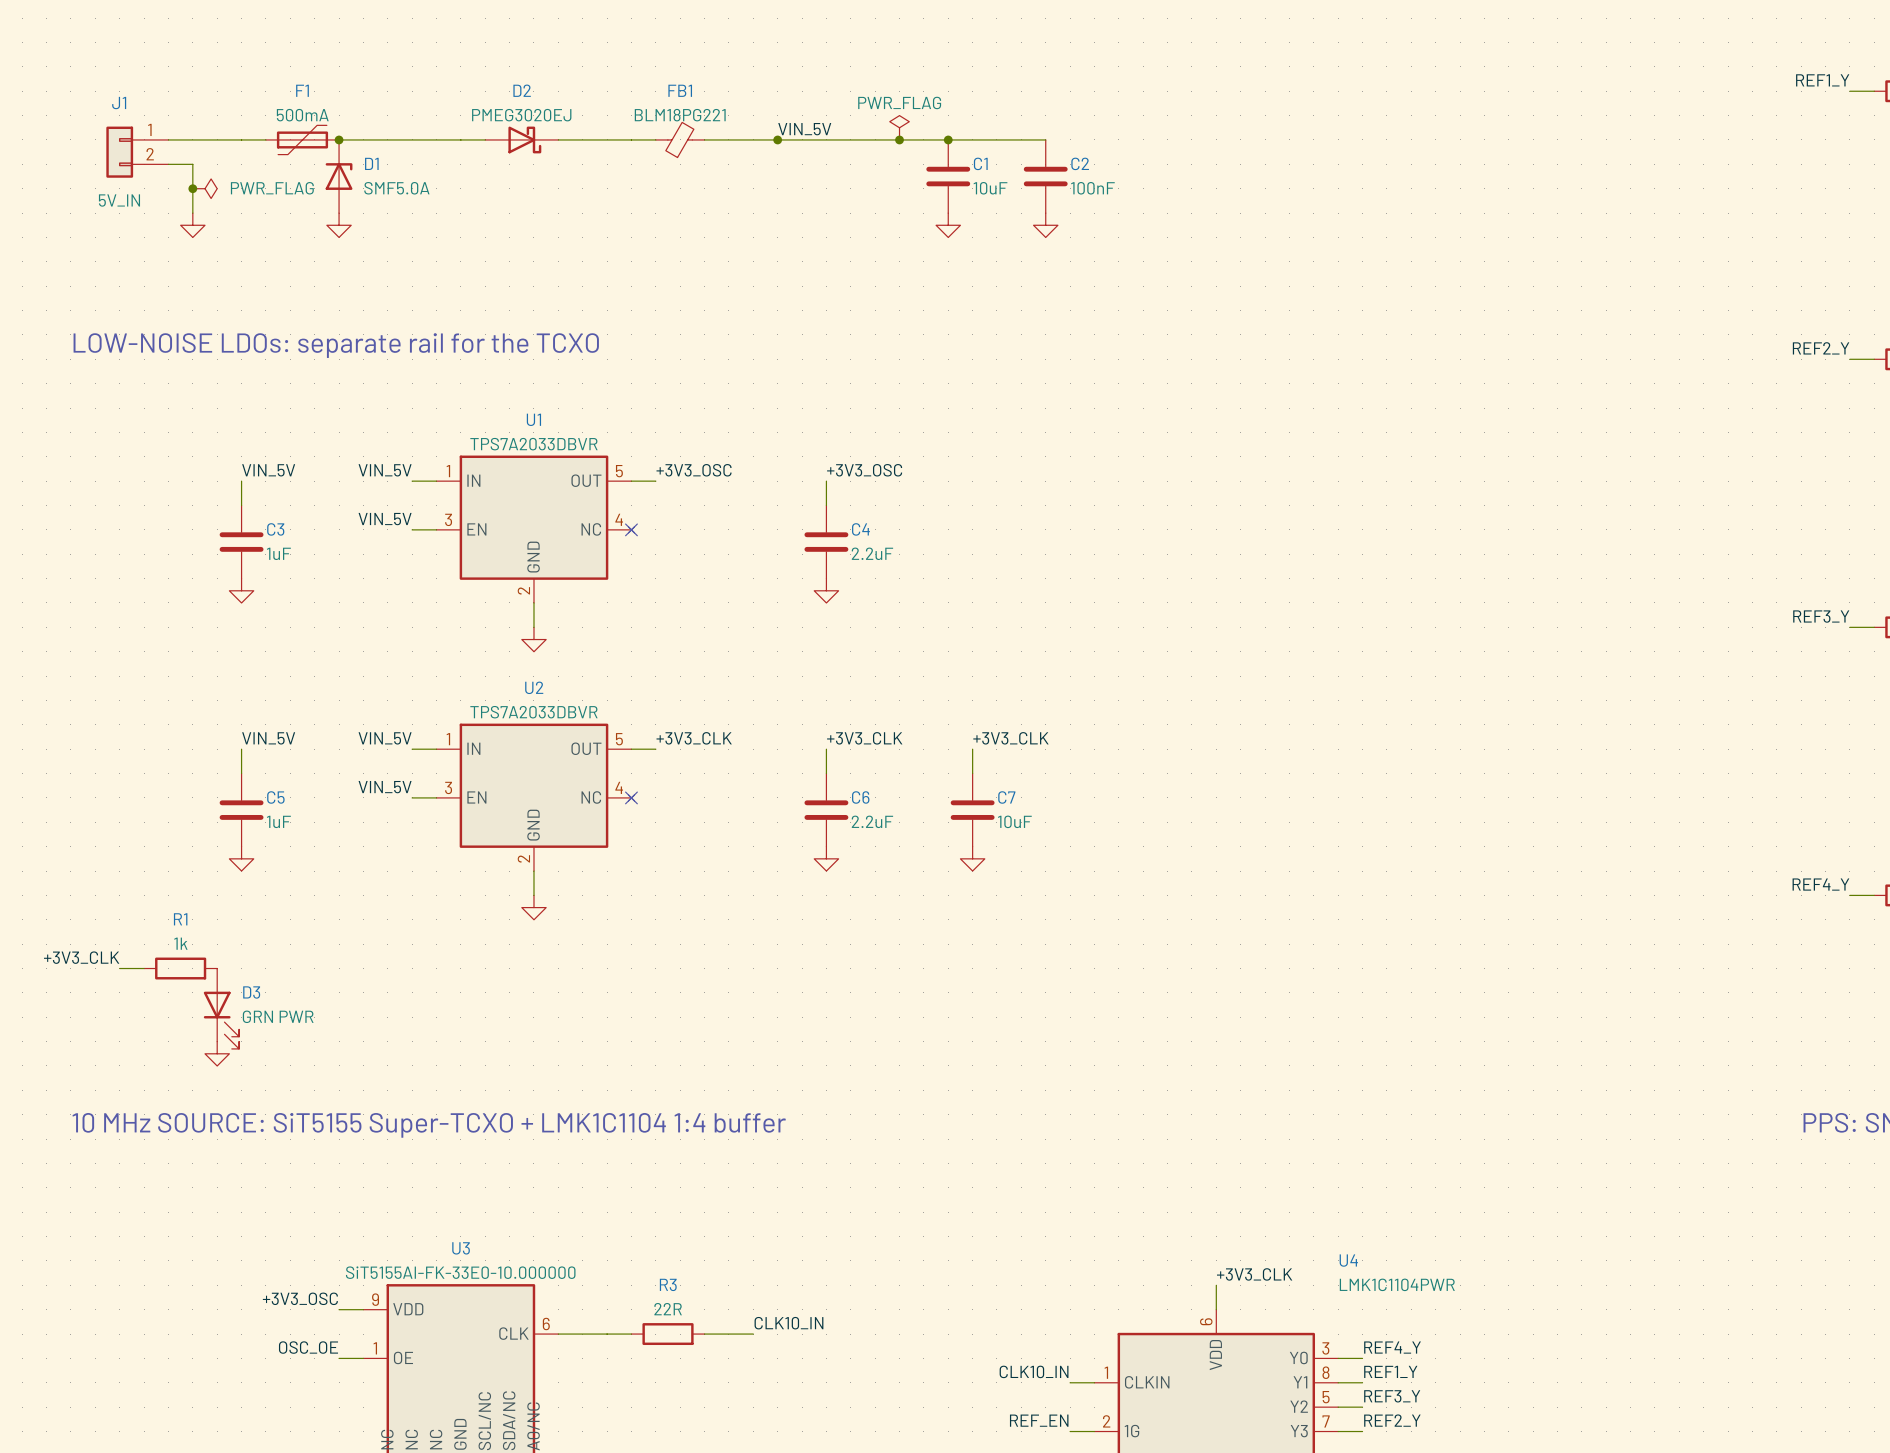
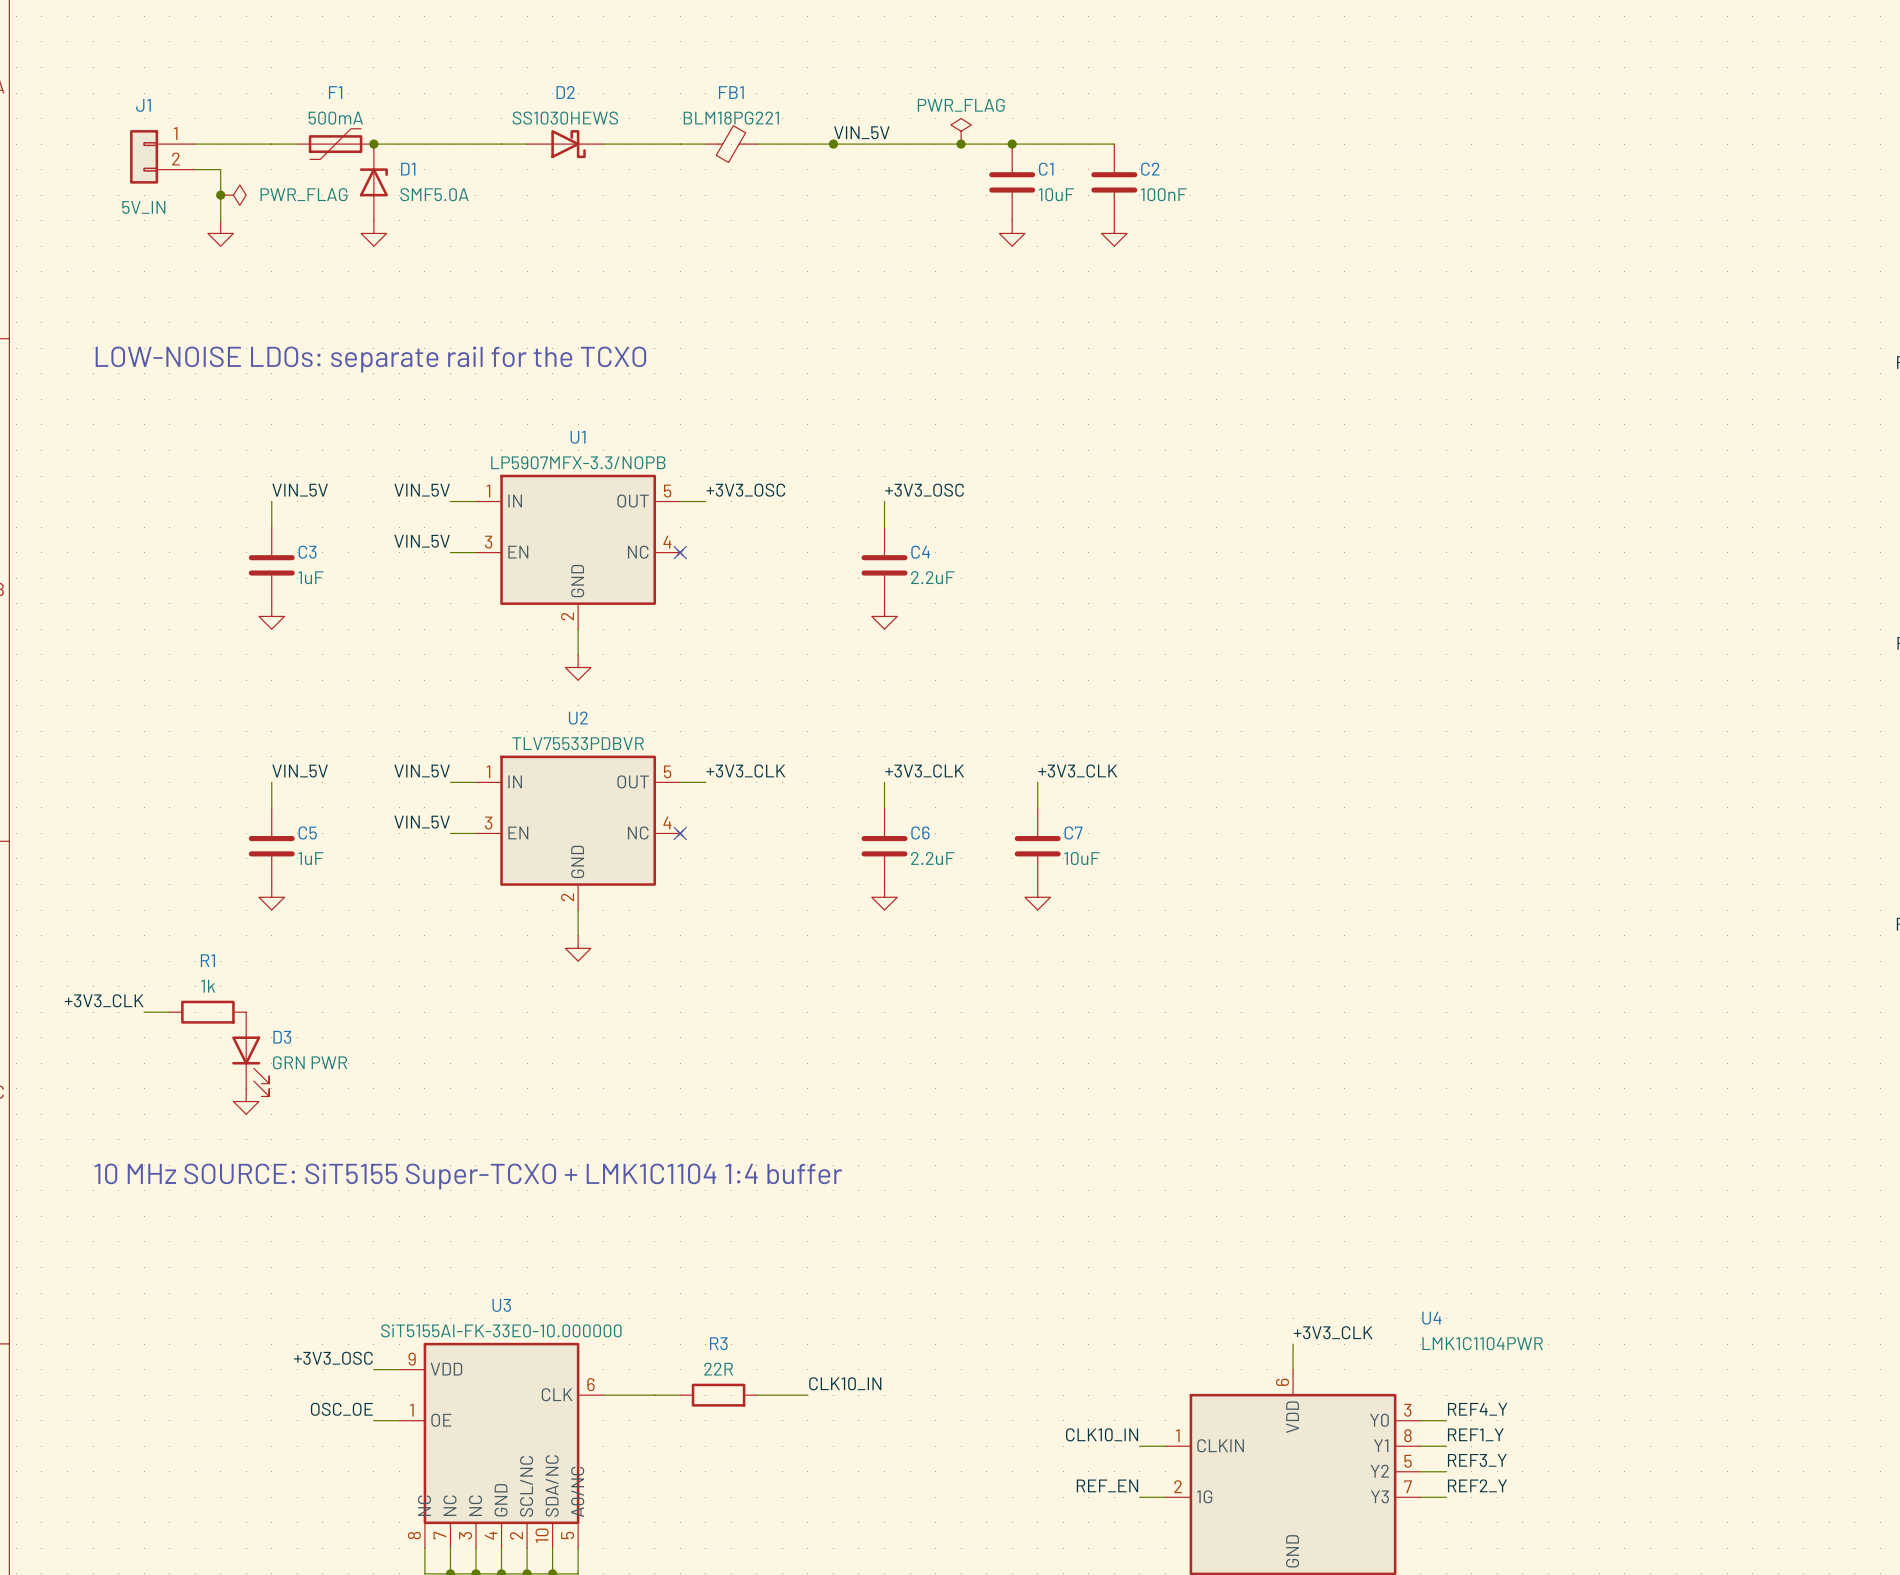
D2 value: PMEG3020EJ (521, 115) -> SS1030HEWS (565, 118)
U1 value: TPS7A2033DBVR (533, 444) -> LP5907MFX-3.3/NOPB (578, 462)
U2 value: TPS7A2033DBVR (533, 712) -> TLV75533PDBVR (578, 743)

